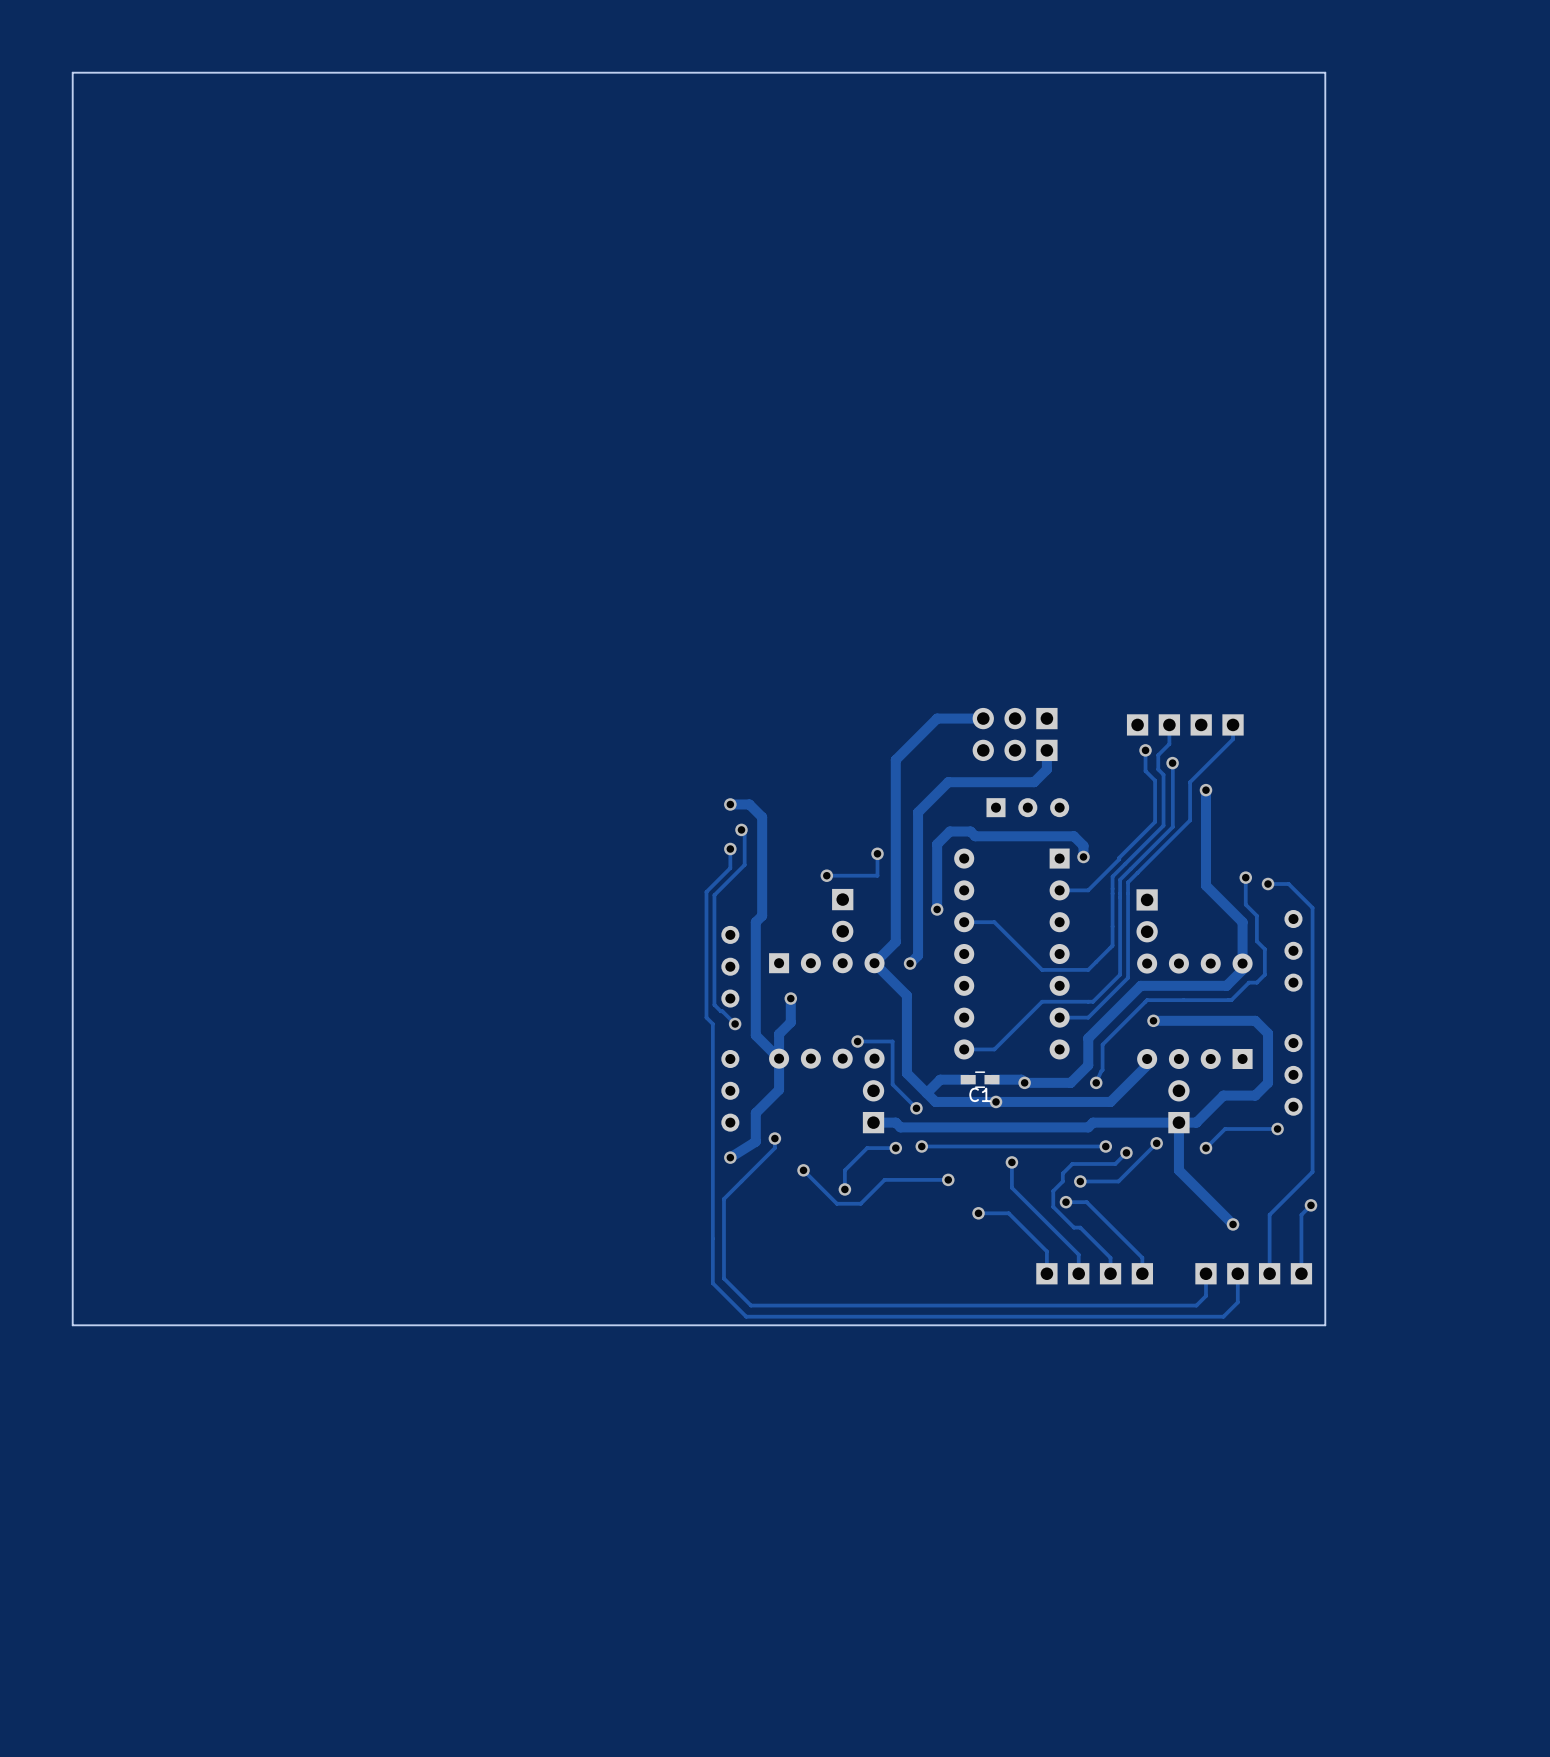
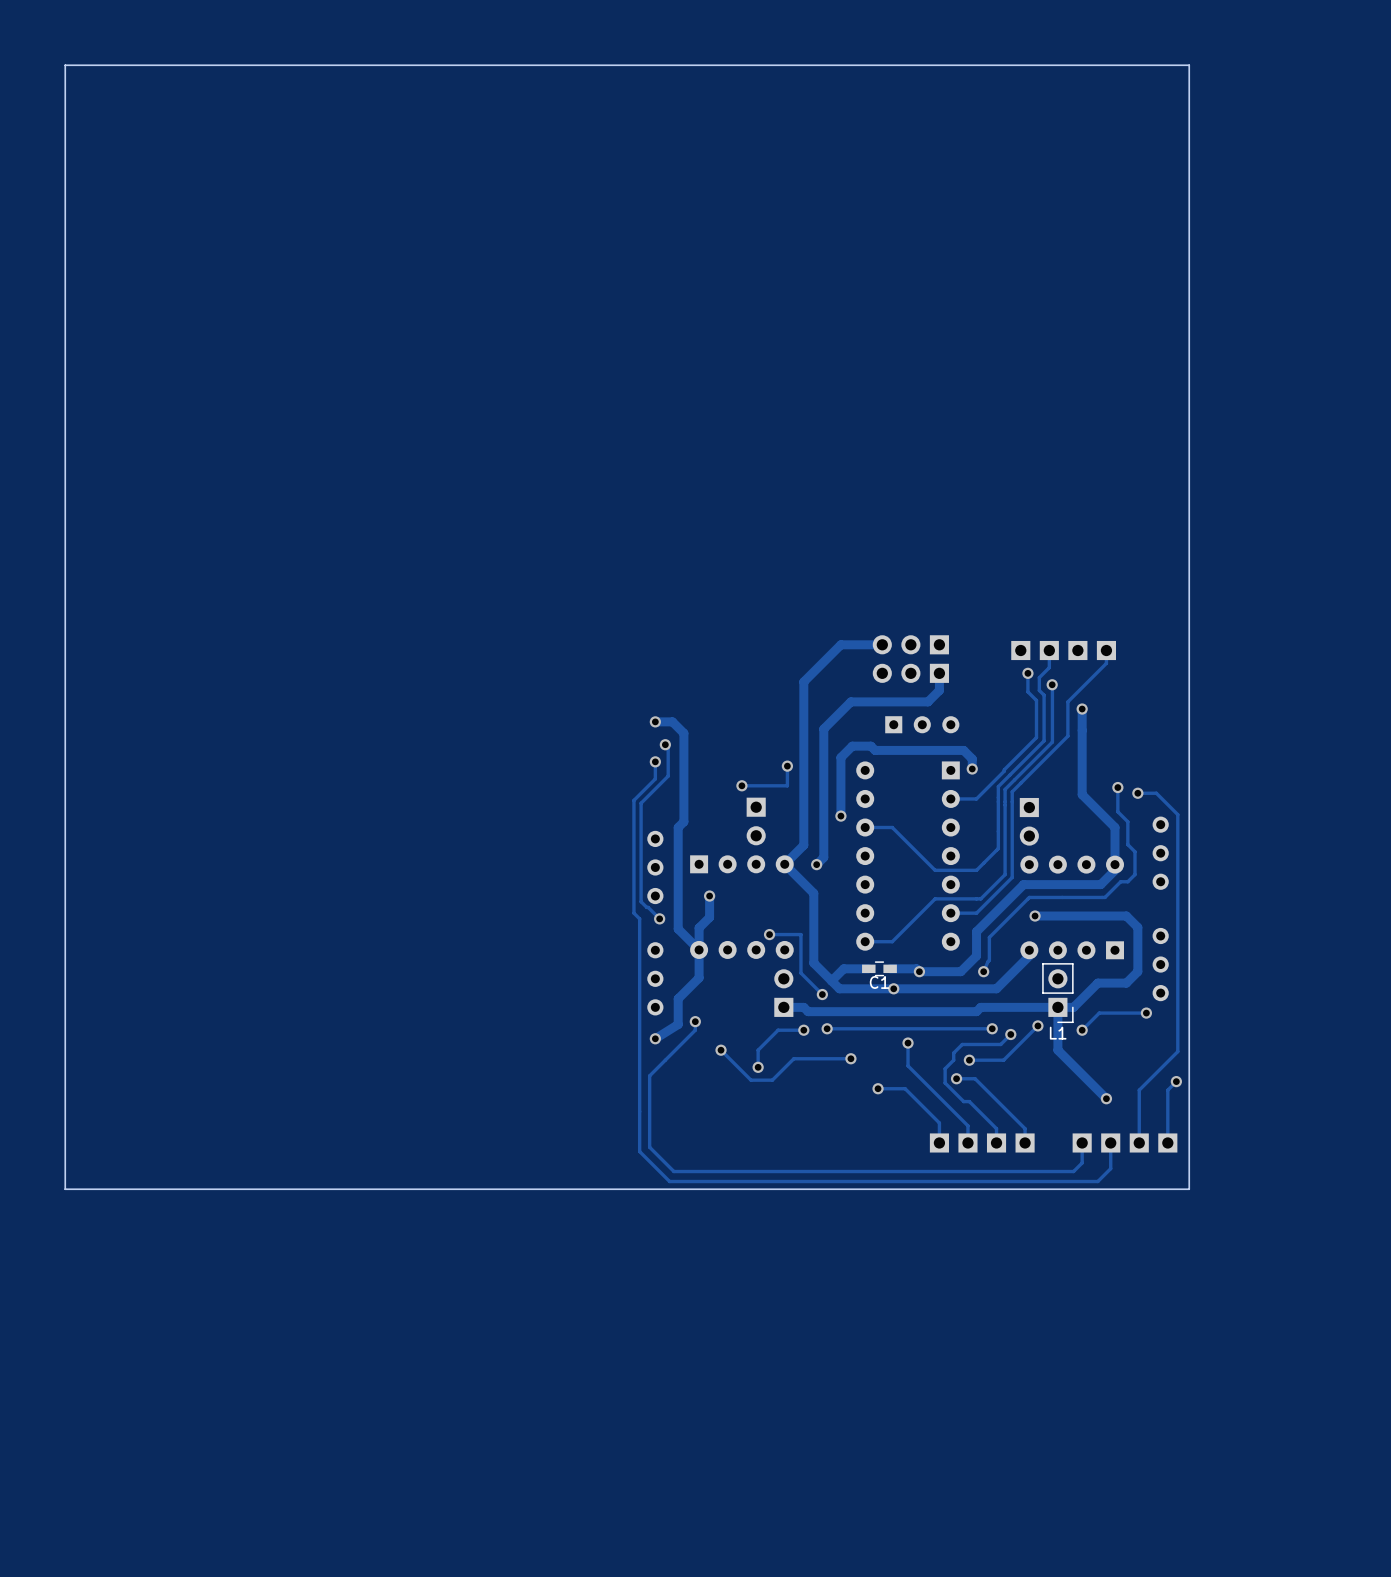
L1 side: top (1178, 1106) -> bottom (1057, 993)

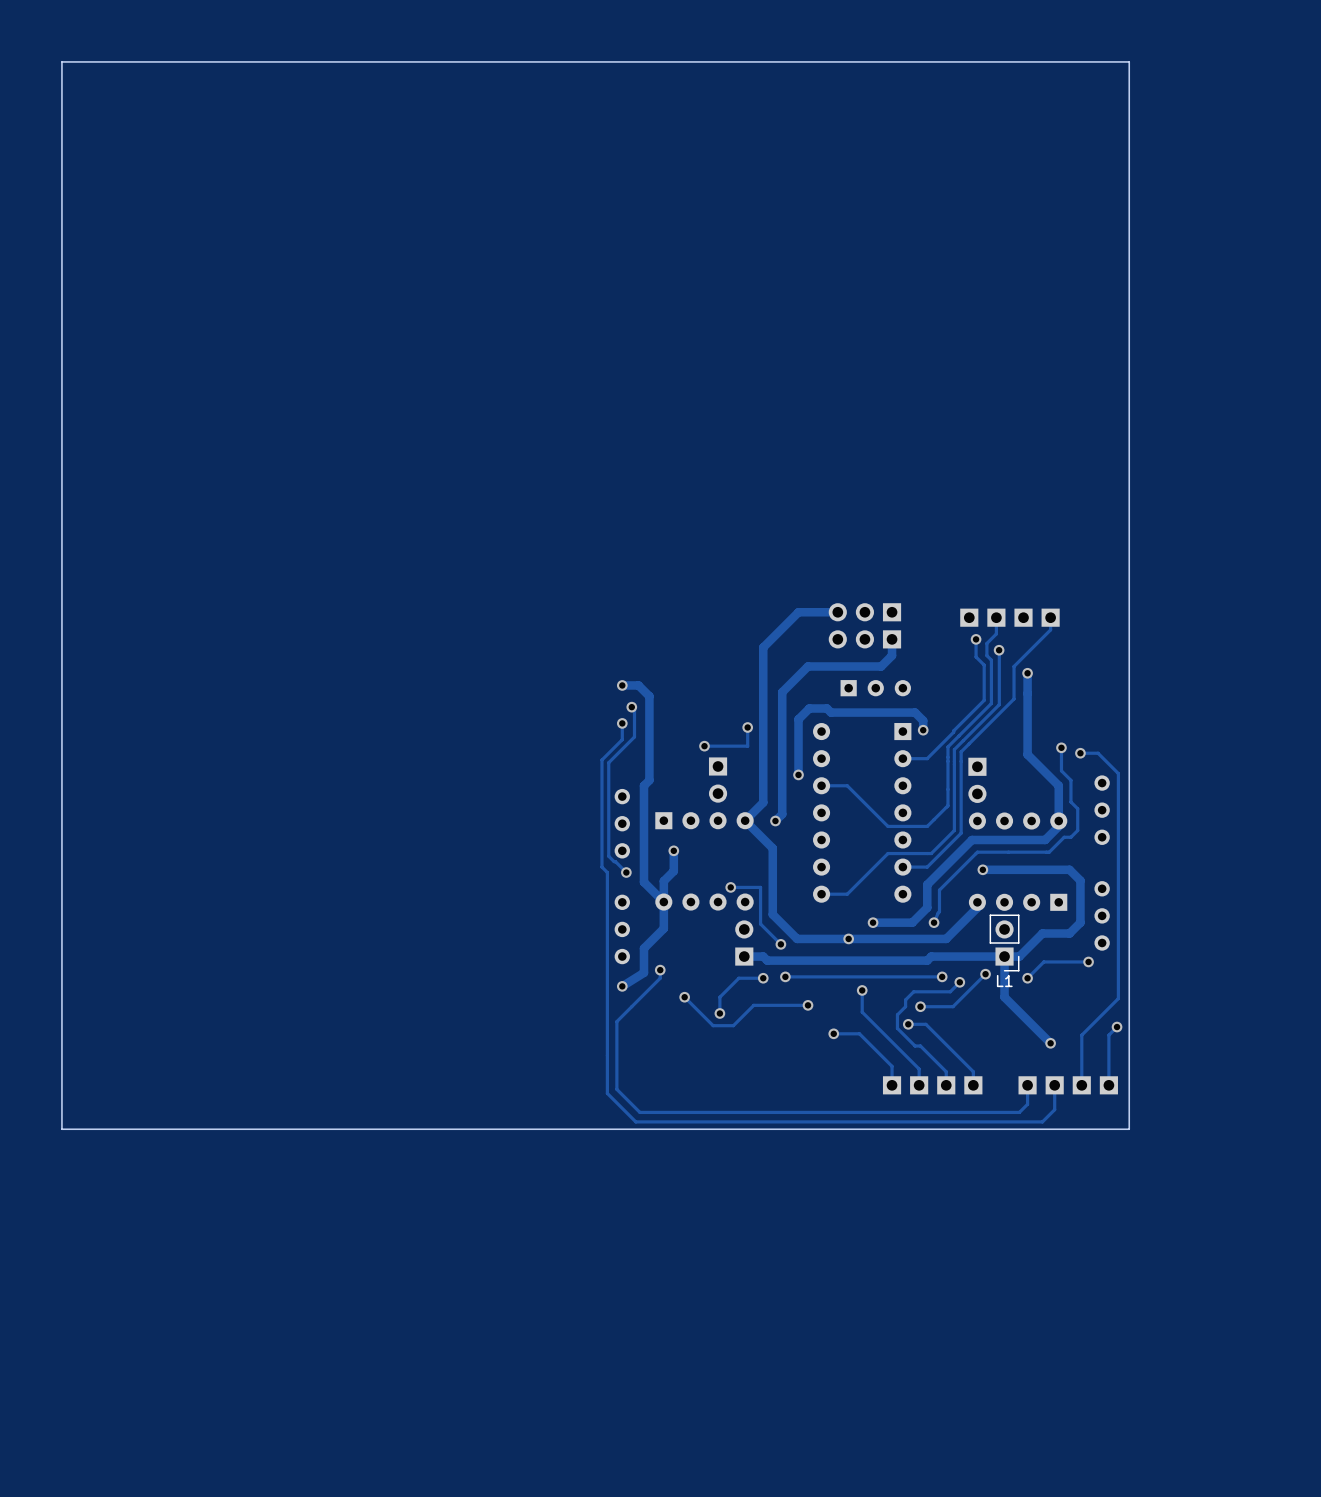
track: (868, 968) (843, 968) (831, 980) -> none
C1: (879, 968) -> none
track: (890, 968) (916, 968) (919, 971) -> none

